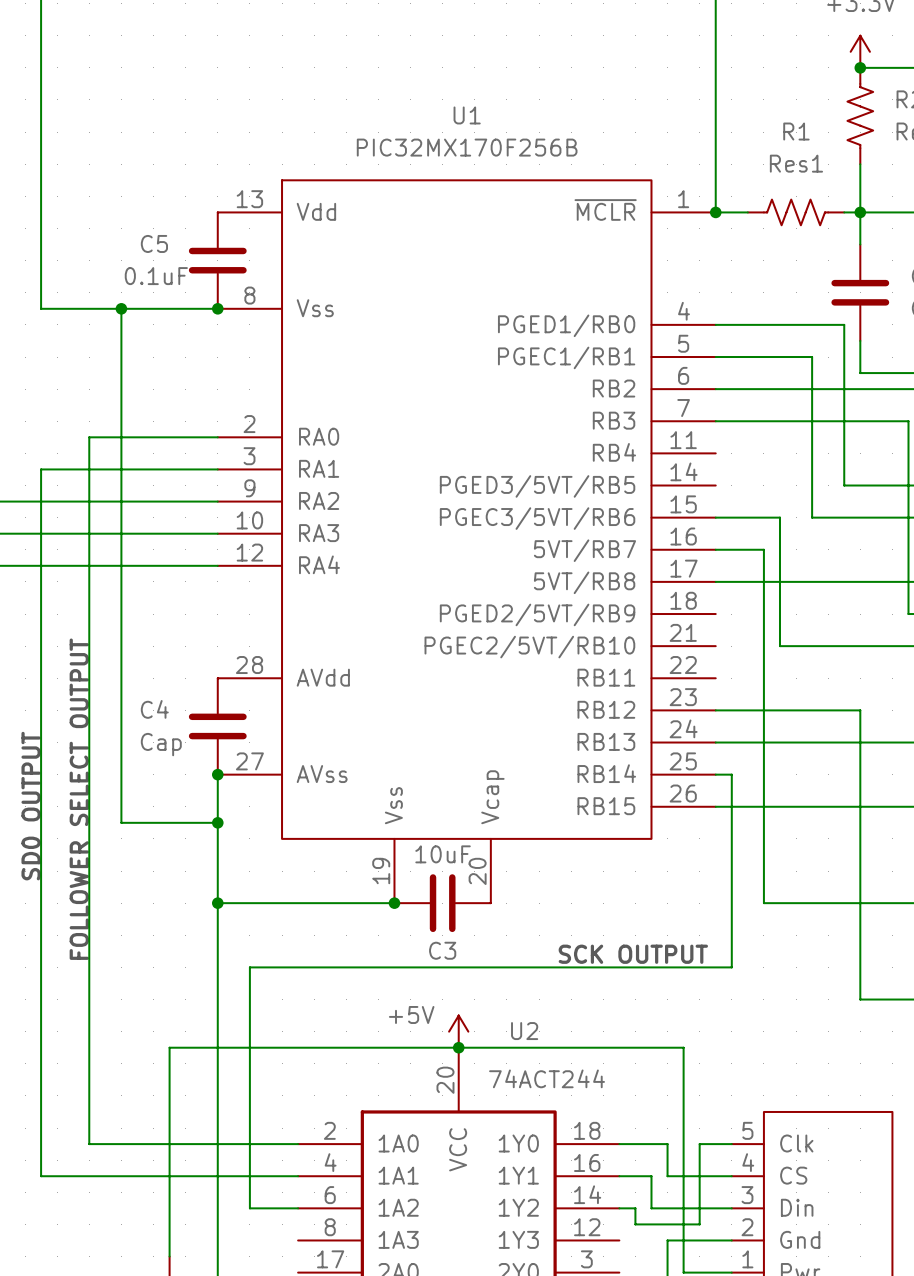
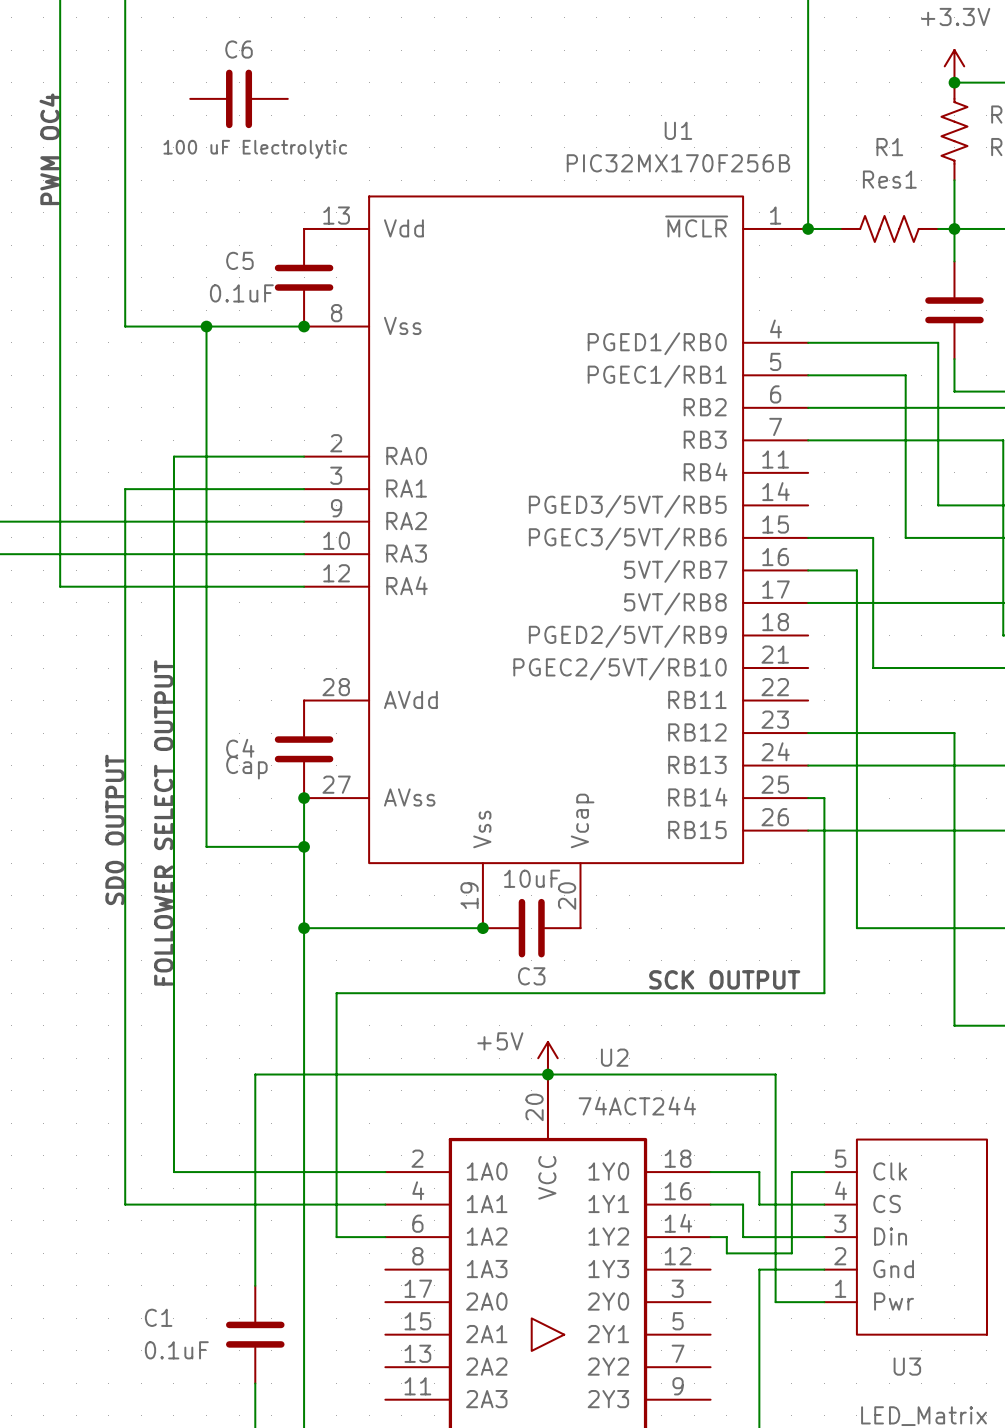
C6: none -> 100 uF Electrolytic (239, 98)
U1 name position: U1 (467, 115) -> U1 (678, 130)
U1 value position: PIC32MX170F256B (467, 147) -> PIC32MX170F256B (678, 163)
C4 name position: C4 (154, 709) -> C4 (240, 748)

